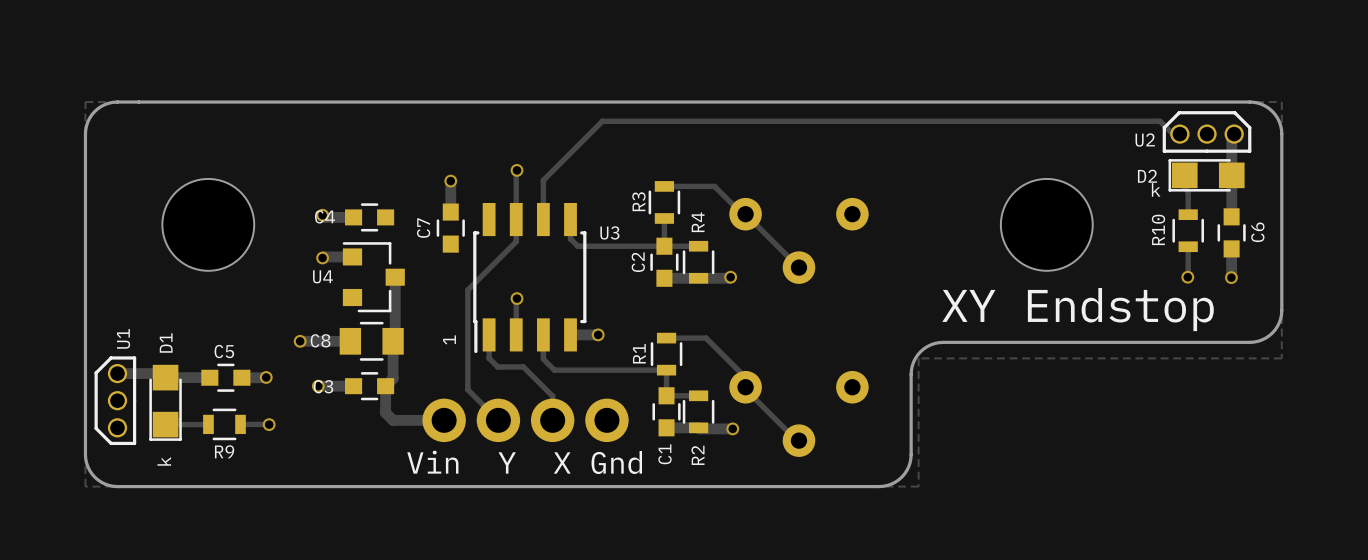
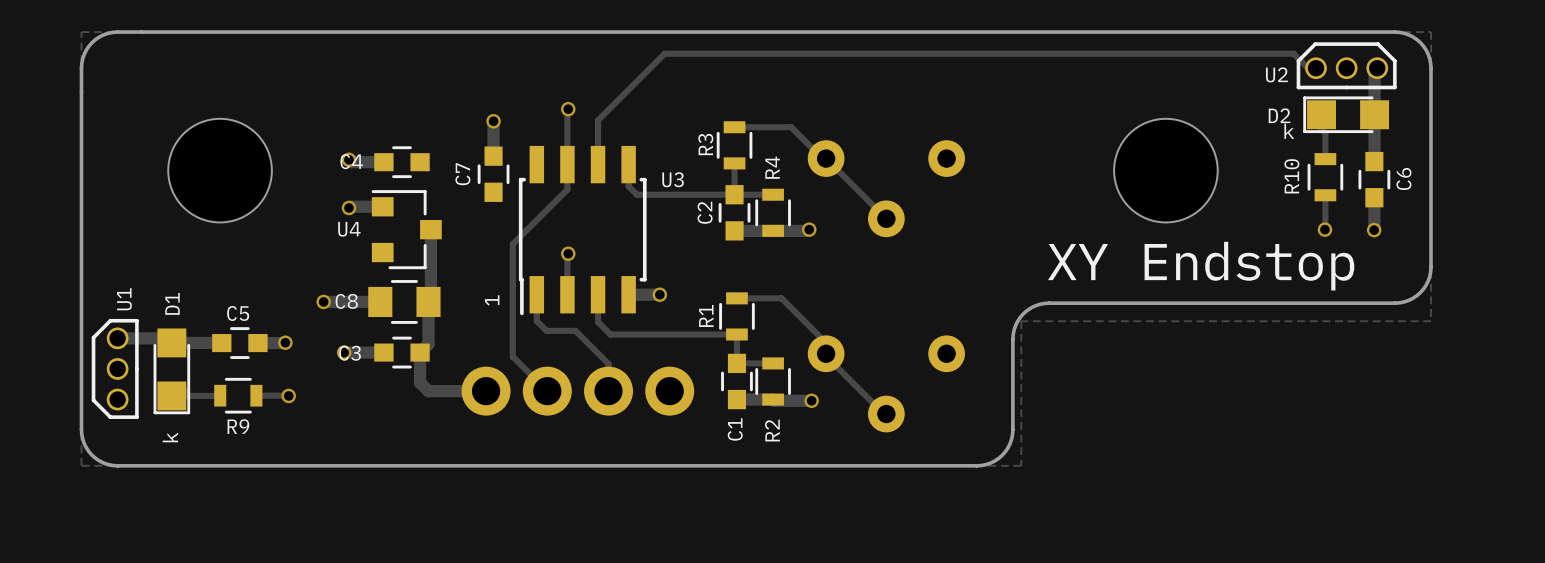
text: Vin Y X Gnd (524, 462) -> none

